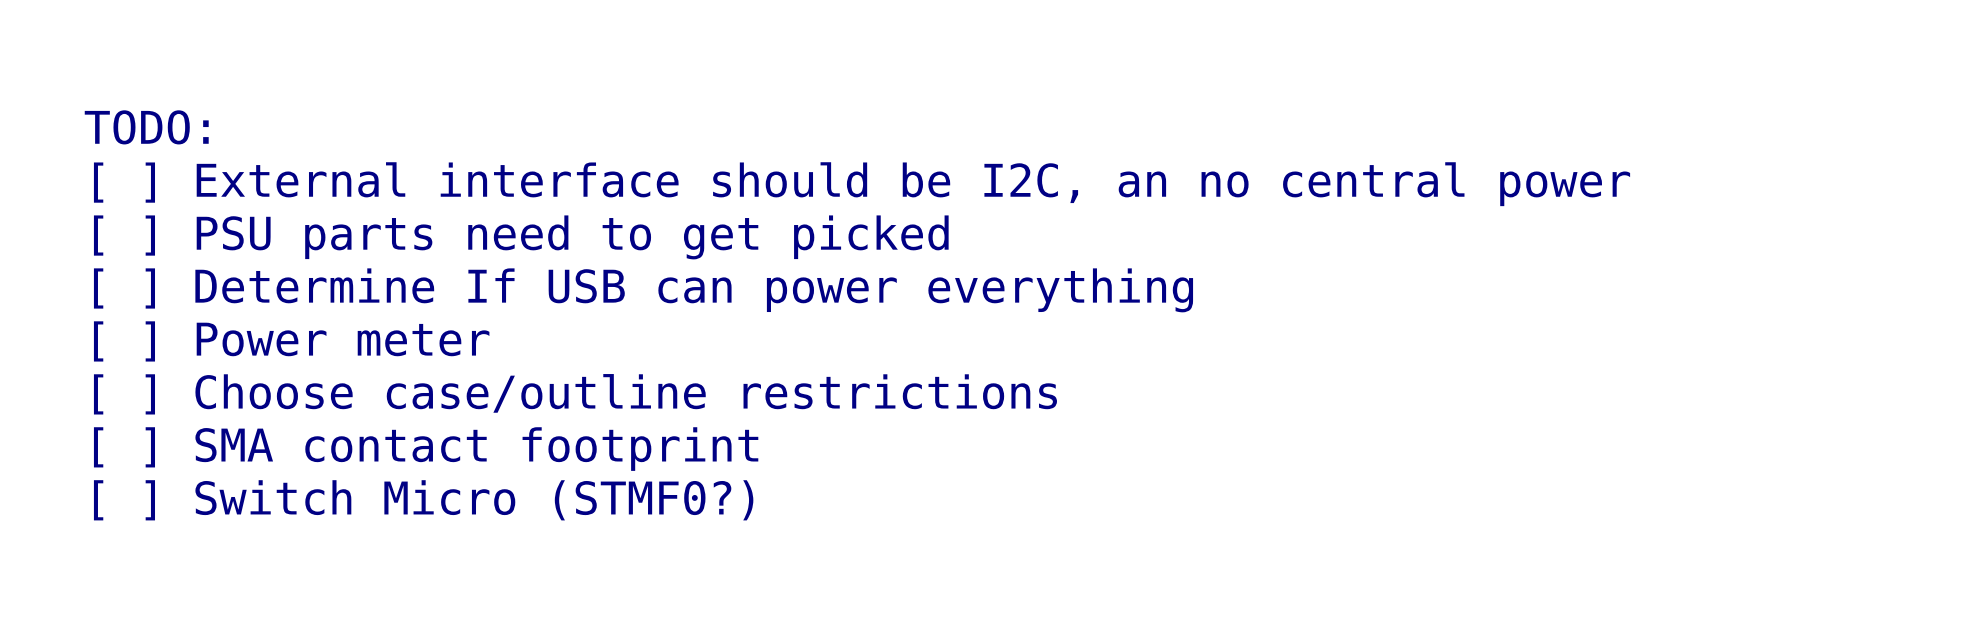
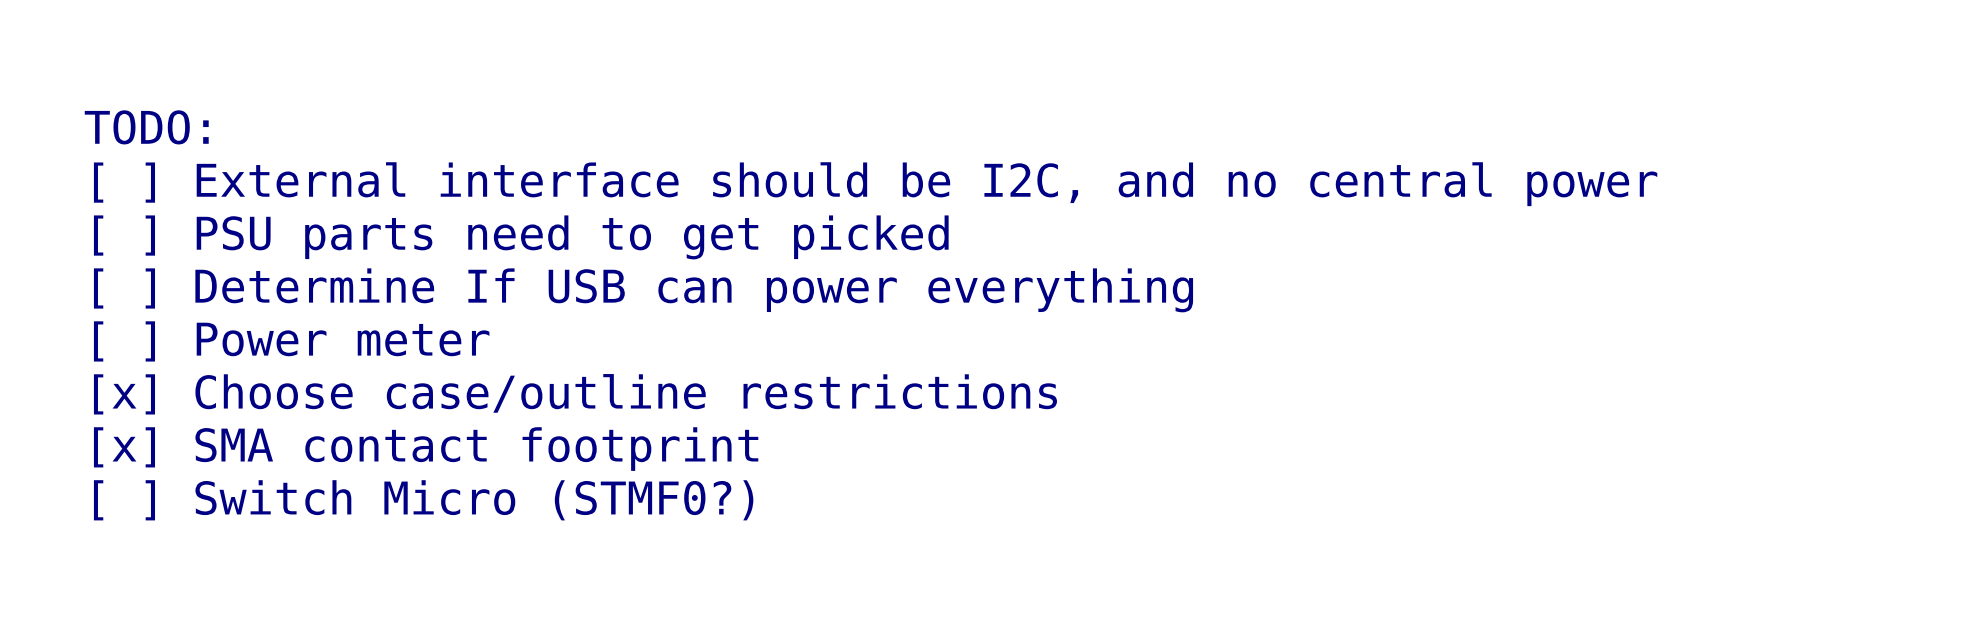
text: [ ] External interface should be I2C, an no central power (862, 184) -> [ ] External interface should be I2C, and no central power (875, 184)
text: [ ] Choose case/outline restrictions (575, 394) -> [x] Choose case/outline restrictions (575, 394)
text: [ ] SMA contact footprint (426, 449) -> [x] SMA contact footprint (426, 449)

